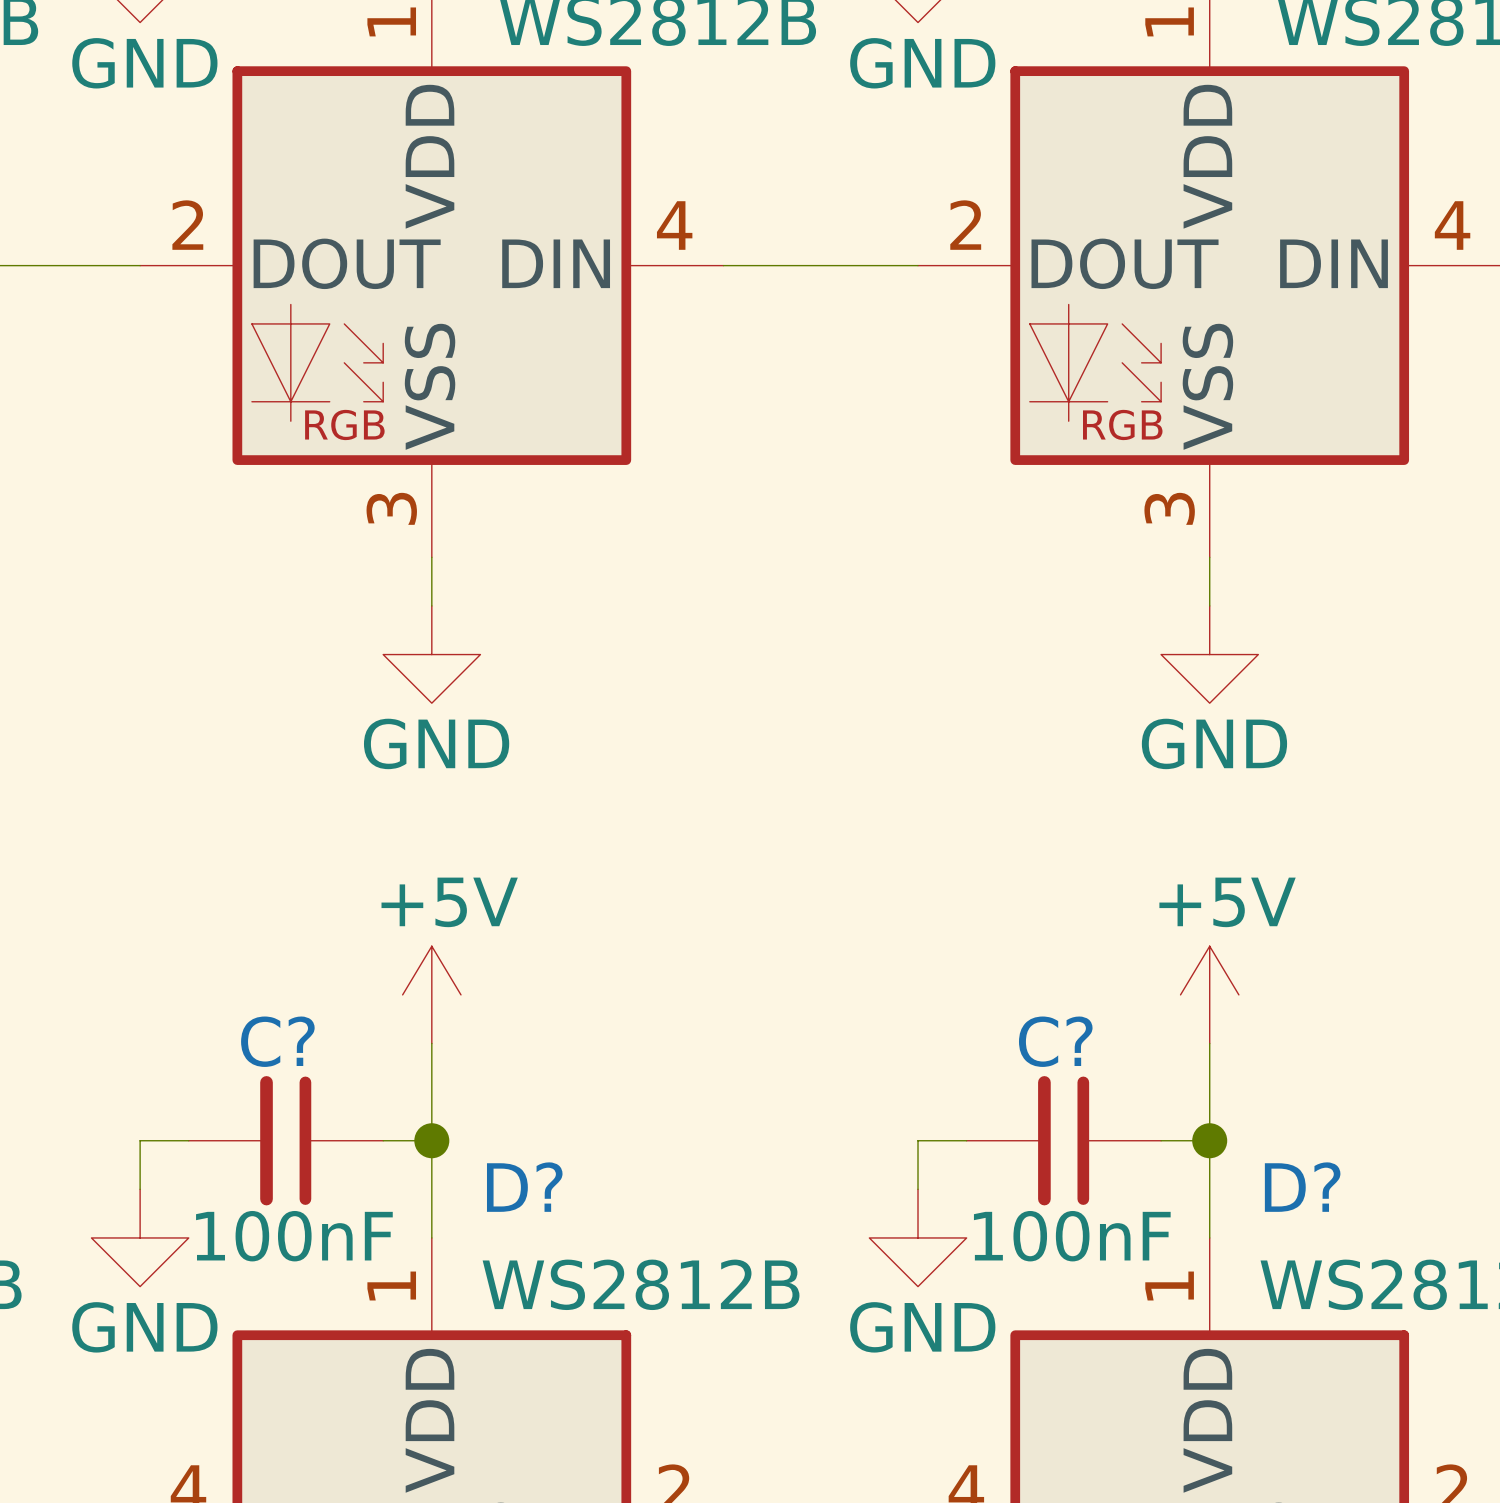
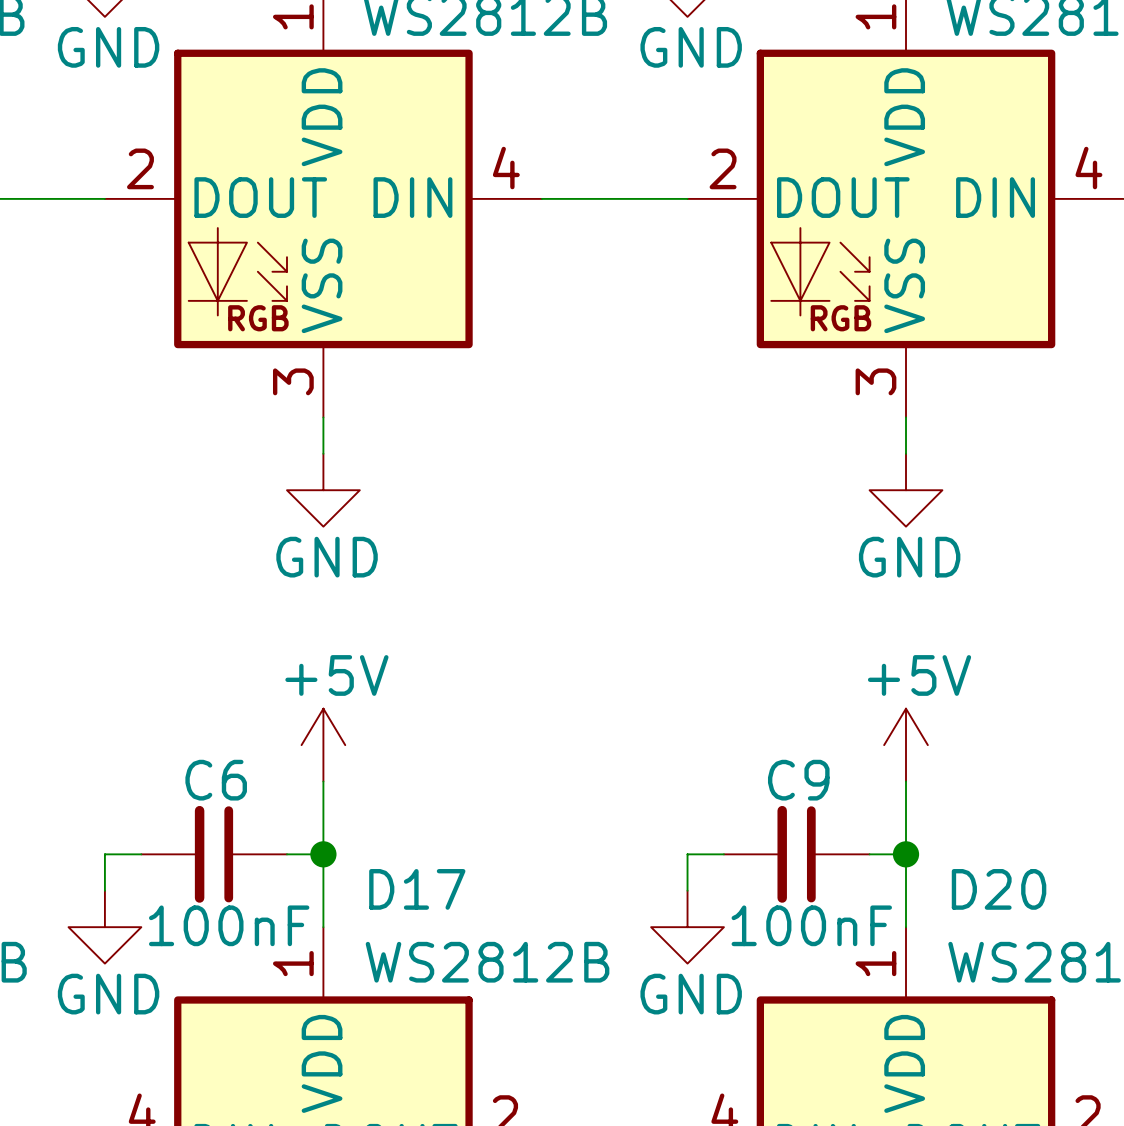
C? name: C? (277, 1041) -> C6 (216, 780)
C? name: C? (1055, 1041) -> C9 (798, 780)
D? name: D? (524, 1187) -> D17 (417, 889)
D? name: D? (1302, 1187) -> D20 (999, 889)

